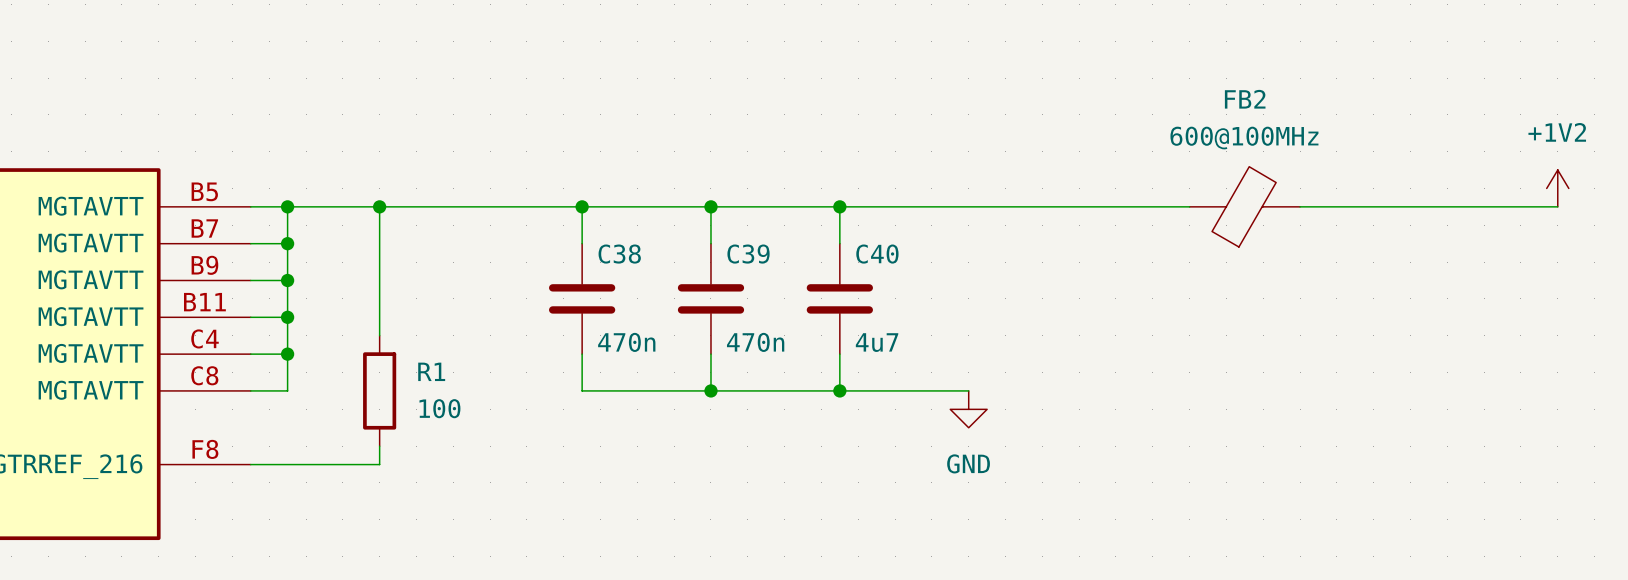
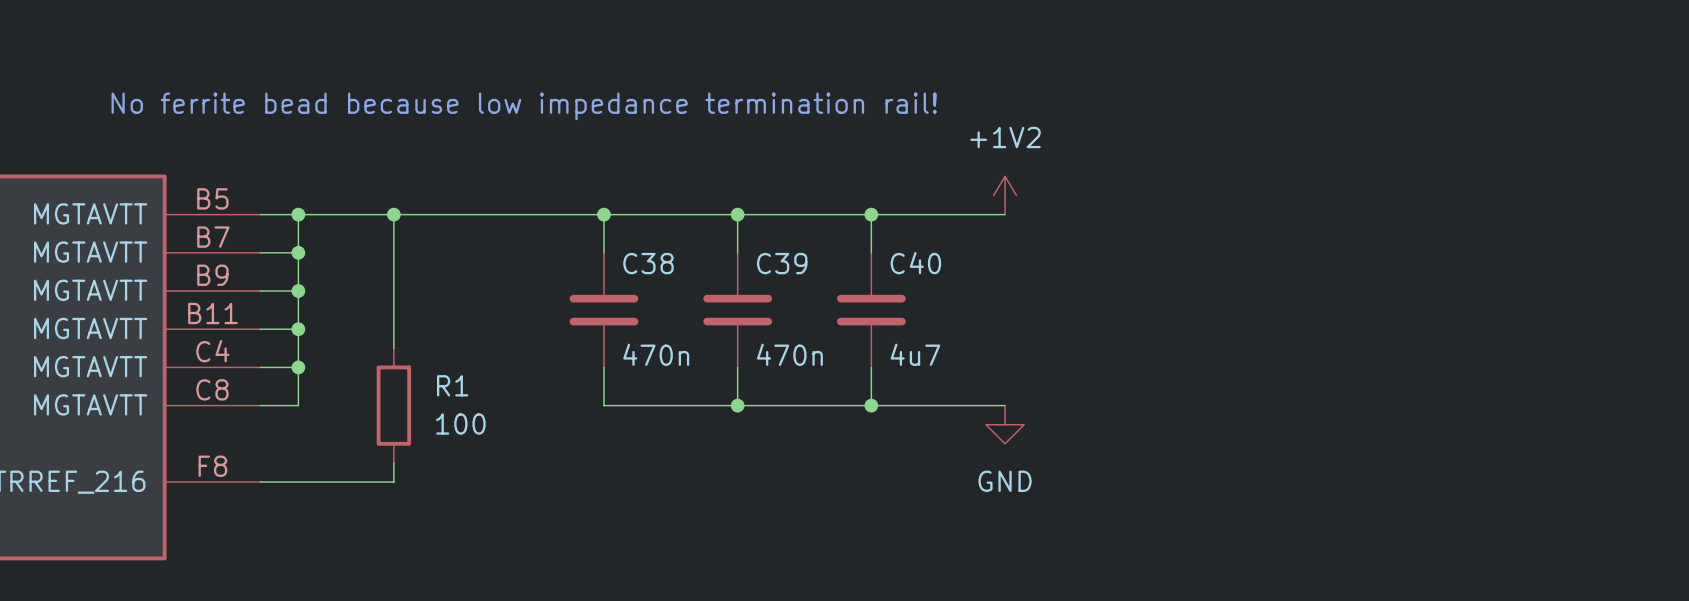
text: none -> No ferrite bead because low impedance termination rail! (524, 106)
power symbol: none -> +1V2 (1005, 195)
power symbol: +1V2 (1557, 188) -> none
wire: (968, 206) (1189, 206) -> none
FB2: 600@100MHz (1244, 206) -> none
wire: (1300, 206) (1557, 206) -> none

